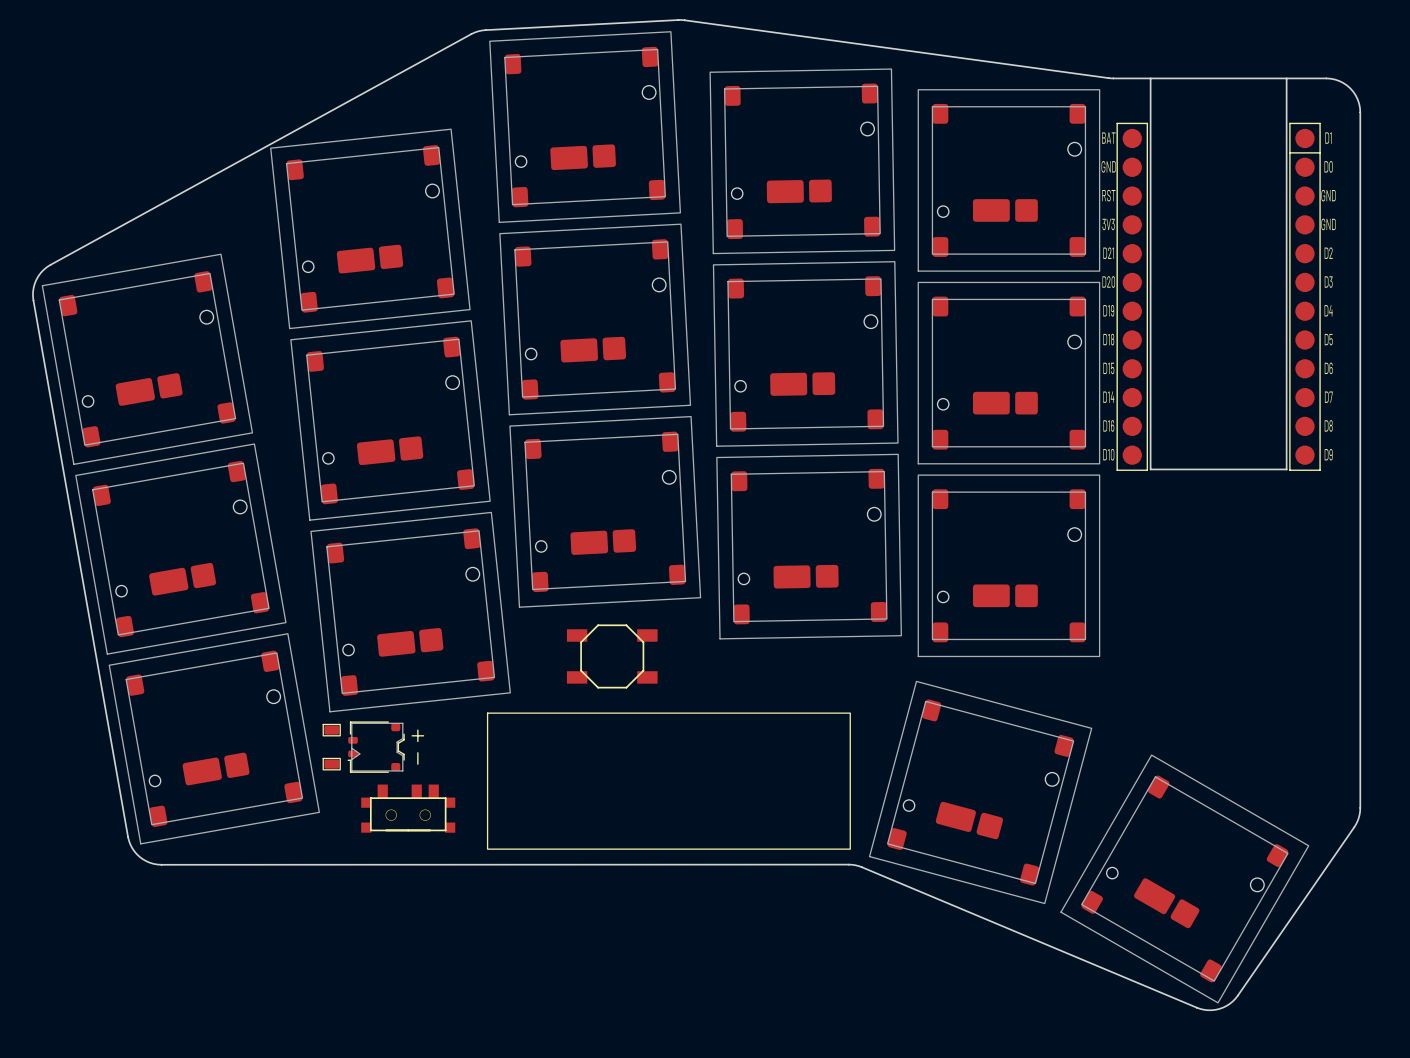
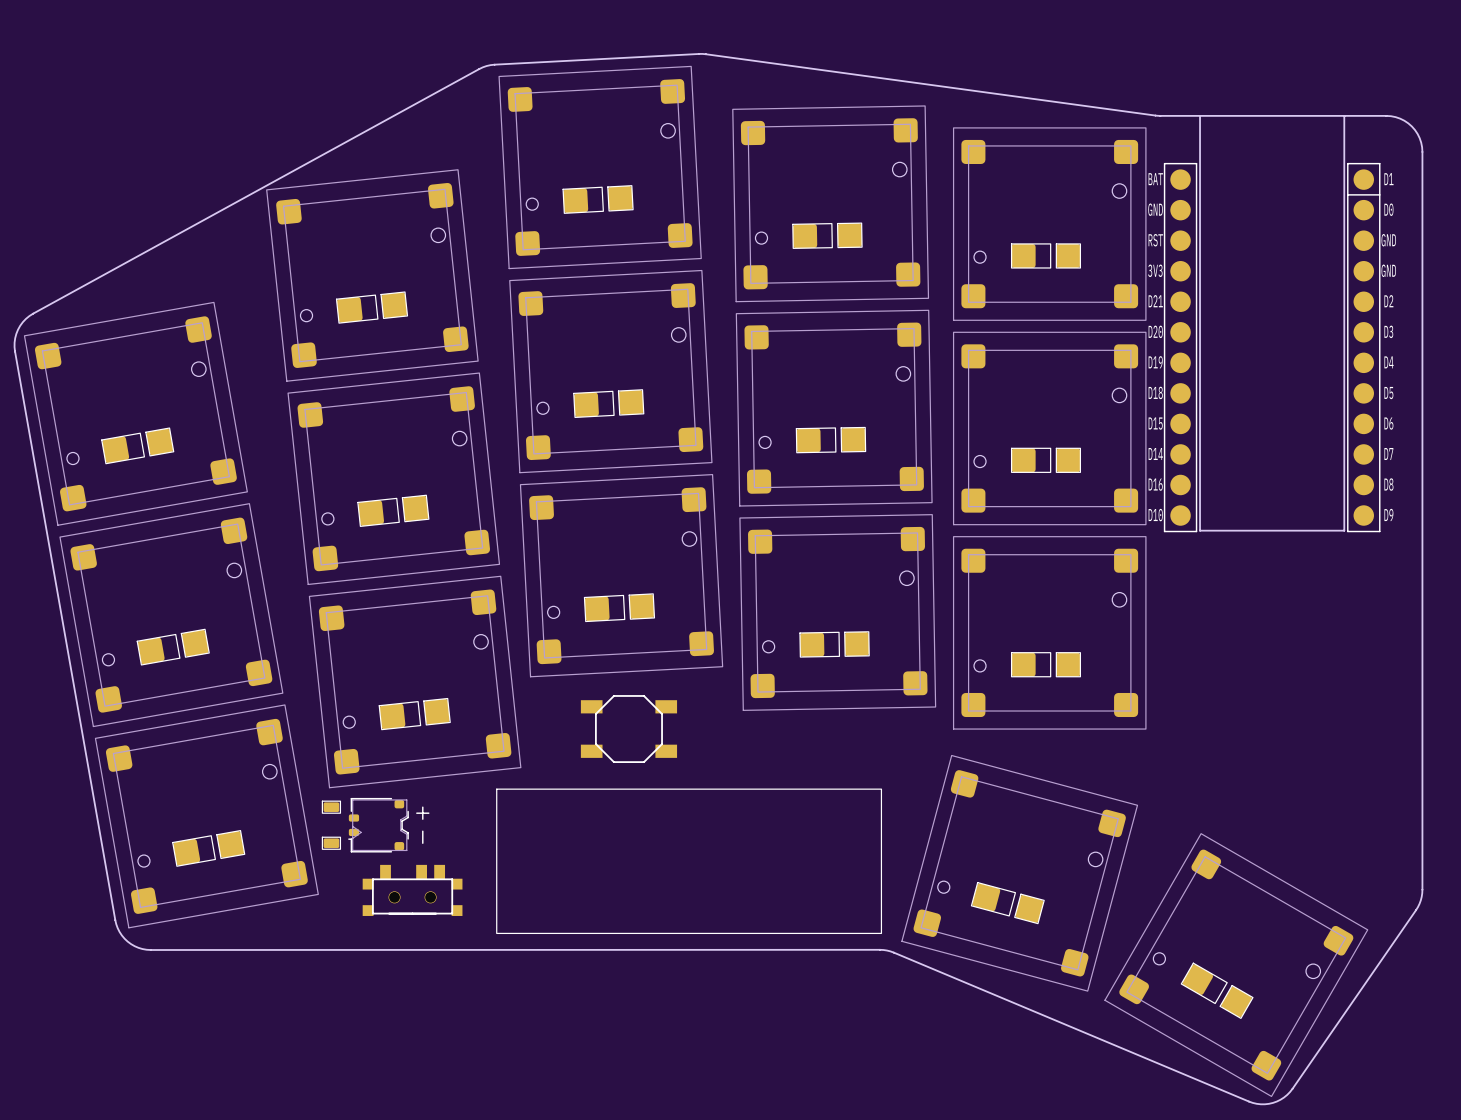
part footprint: [489, 31, 681, 223] -> [498, 65, 702, 270]
part footprint: [709, 68, 896, 255] -> [732, 105, 930, 303]
part footprint: [917, 89, 1101, 272] -> [952, 127, 1147, 321]
part footprint: [270, 128, 471, 330] -> [266, 169, 479, 382]
part footprint: [499, 223, 692, 416] -> [509, 269, 713, 474]
part footprint: [41, 253, 254, 465] -> [23, 301, 248, 526]
part footprint: [712, 261, 899, 447] -> [735, 309, 933, 507]
part footprint: [917, 281, 1101, 465] -> [952, 331, 1147, 526]
part footprint: [290, 320, 491, 521] -> [287, 372, 501, 586]
part footprint: [509, 416, 702, 608] -> [519, 474, 724, 678]
part footprint: [75, 443, 287, 655] -> [59, 503, 284, 728]
part footprint: [716, 453, 902, 640] -> [739, 514, 937, 711]
part footprint: [917, 474, 1101, 658] -> [952, 536, 1147, 730]
part footprint: [310, 511, 511, 713] -> [308, 575, 522, 789]
part footprint: [108, 633, 320, 845] -> [94, 704, 319, 929]
part footprint: [868, 680, 1093, 905] -> [901, 754, 1139, 992]
part footprint: [1060, 754, 1310, 1004] -> [1104, 833, 1369, 1098]

